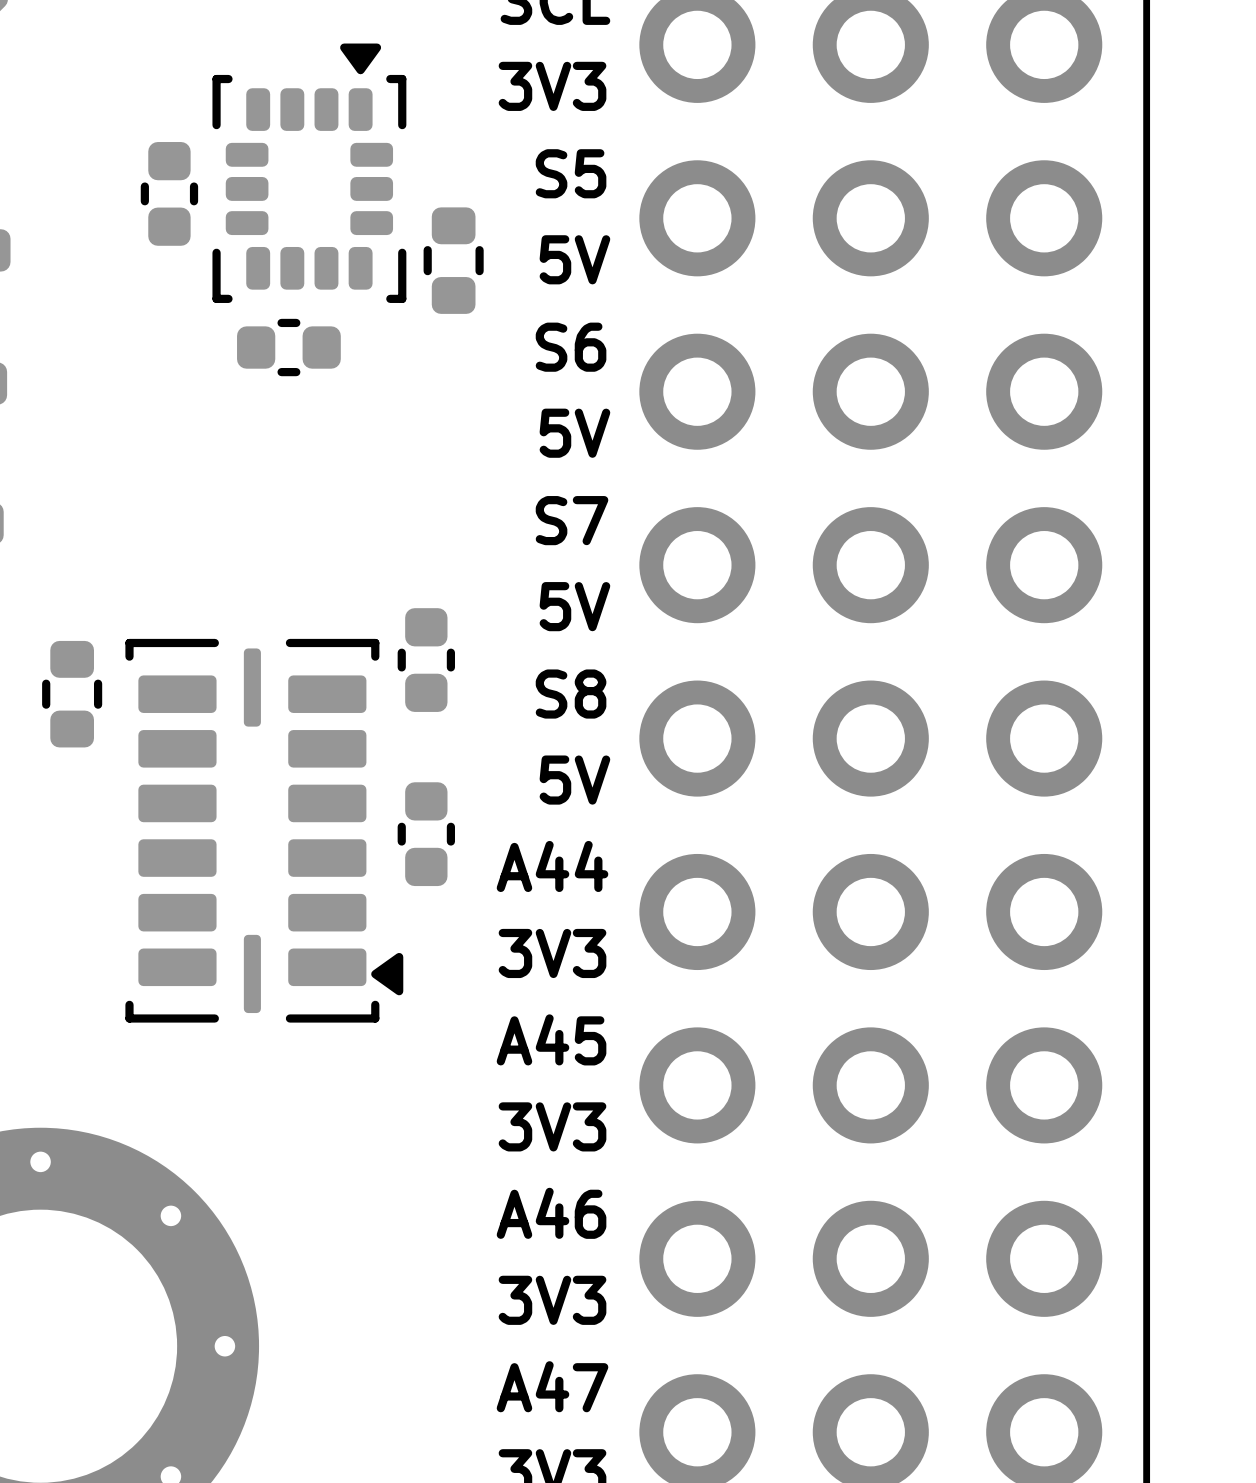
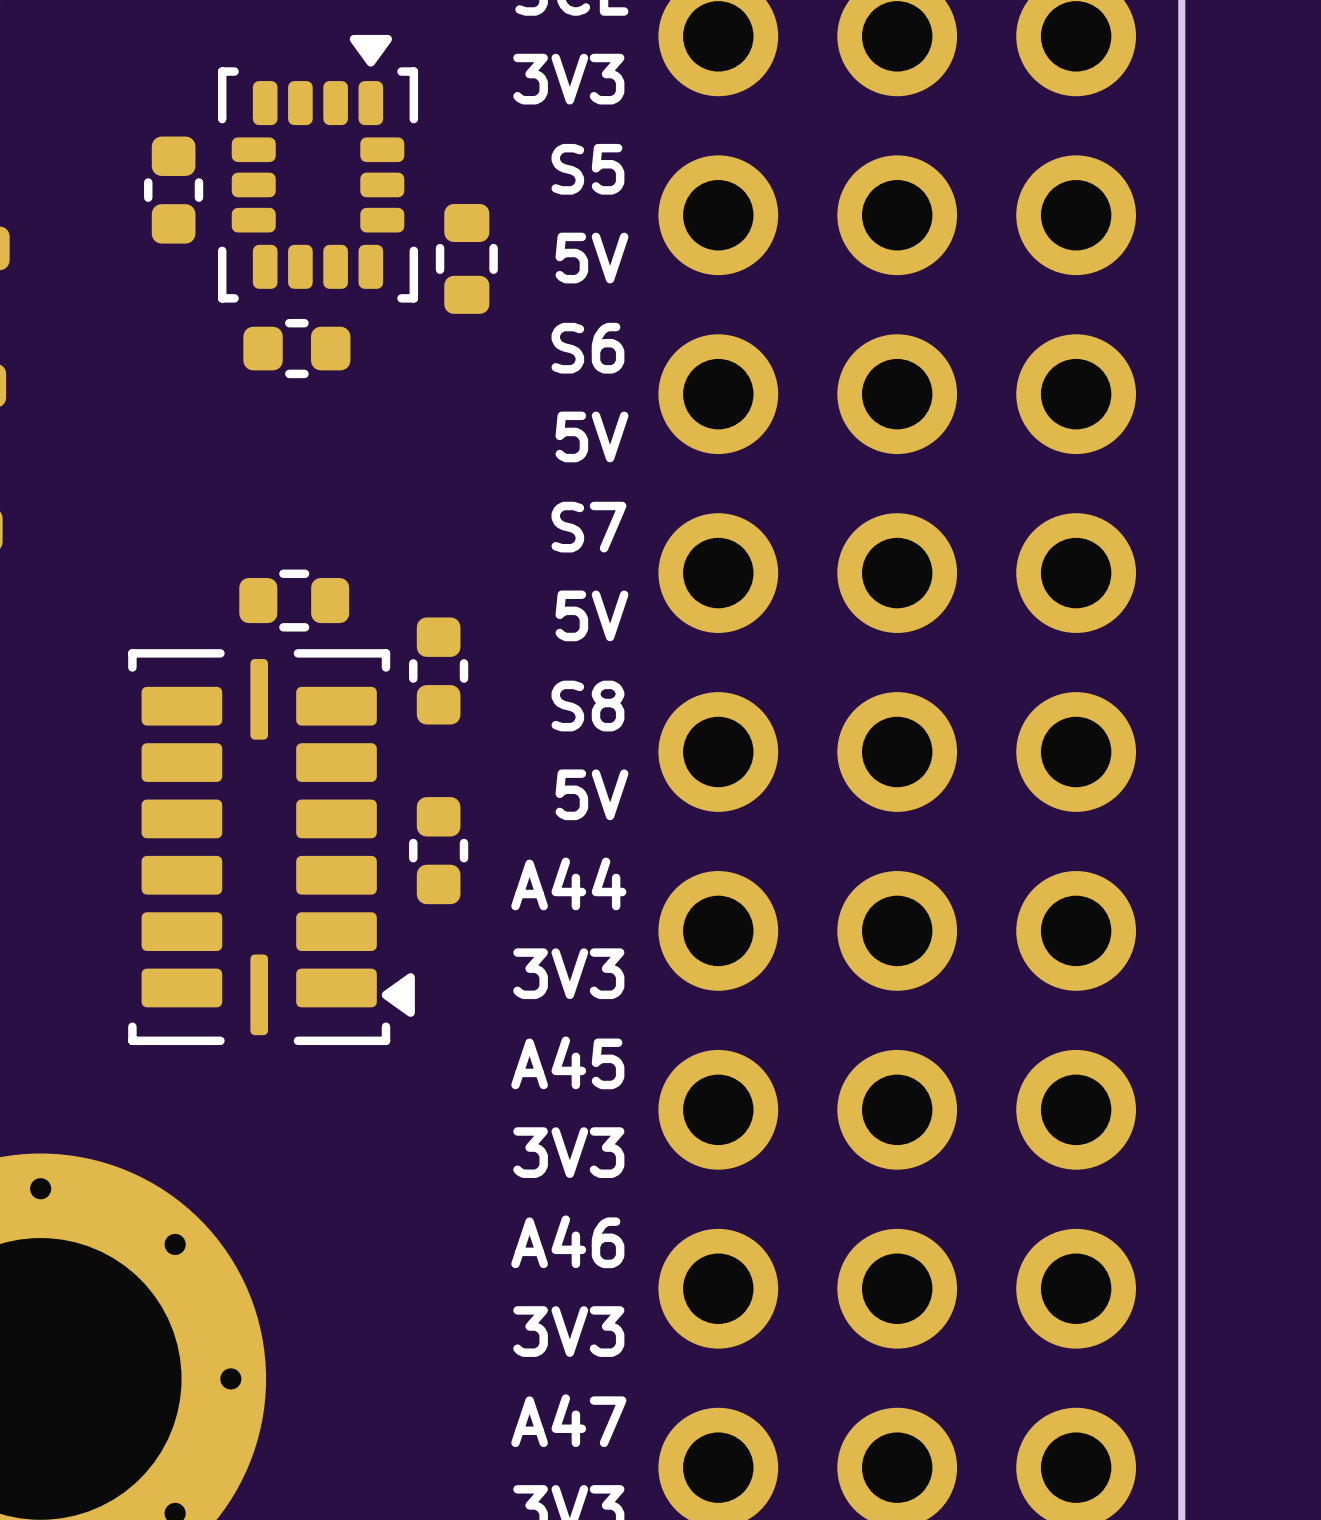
part rotation: 0° (72, 694) -> 90° clockwise (294, 600)
part position: (72, 694) -> (294, 600)

